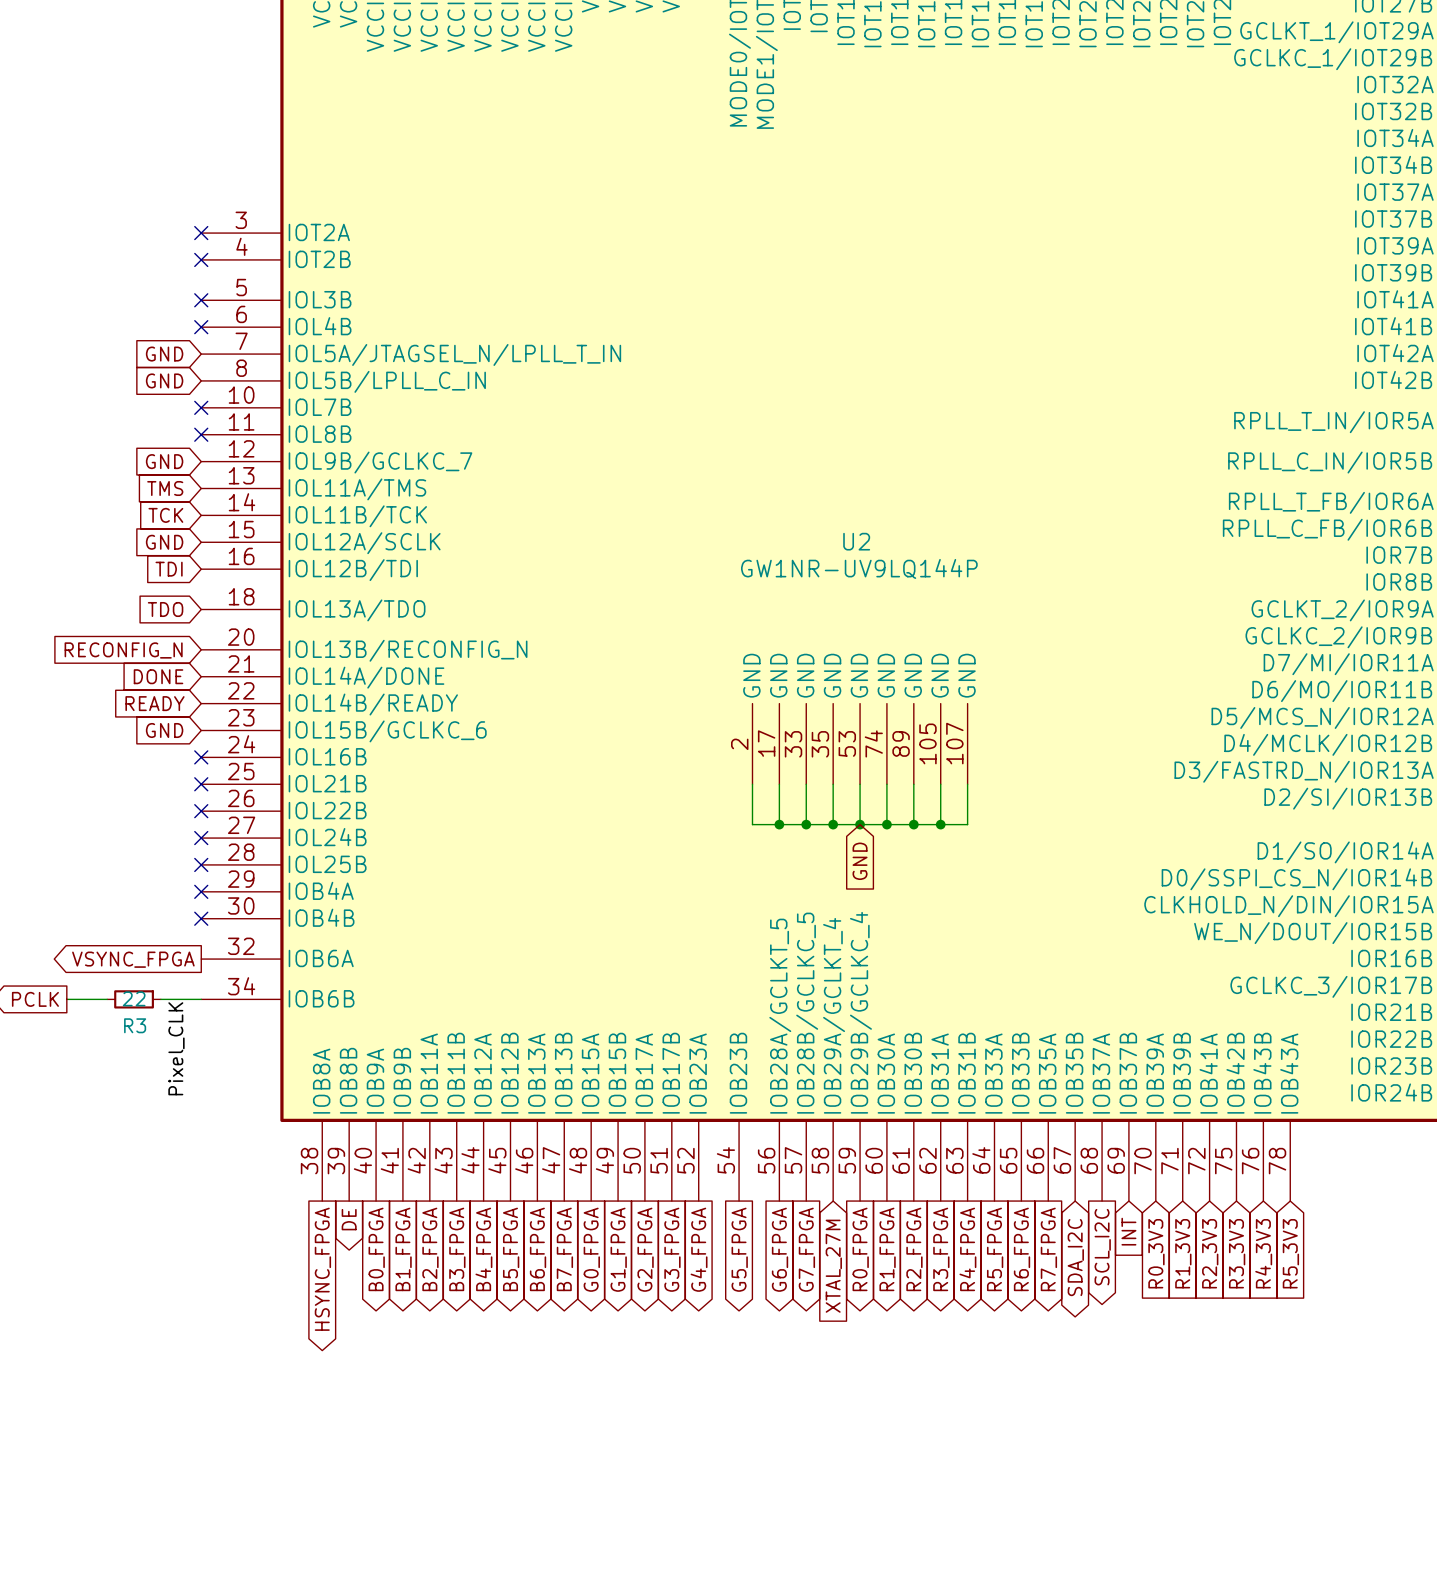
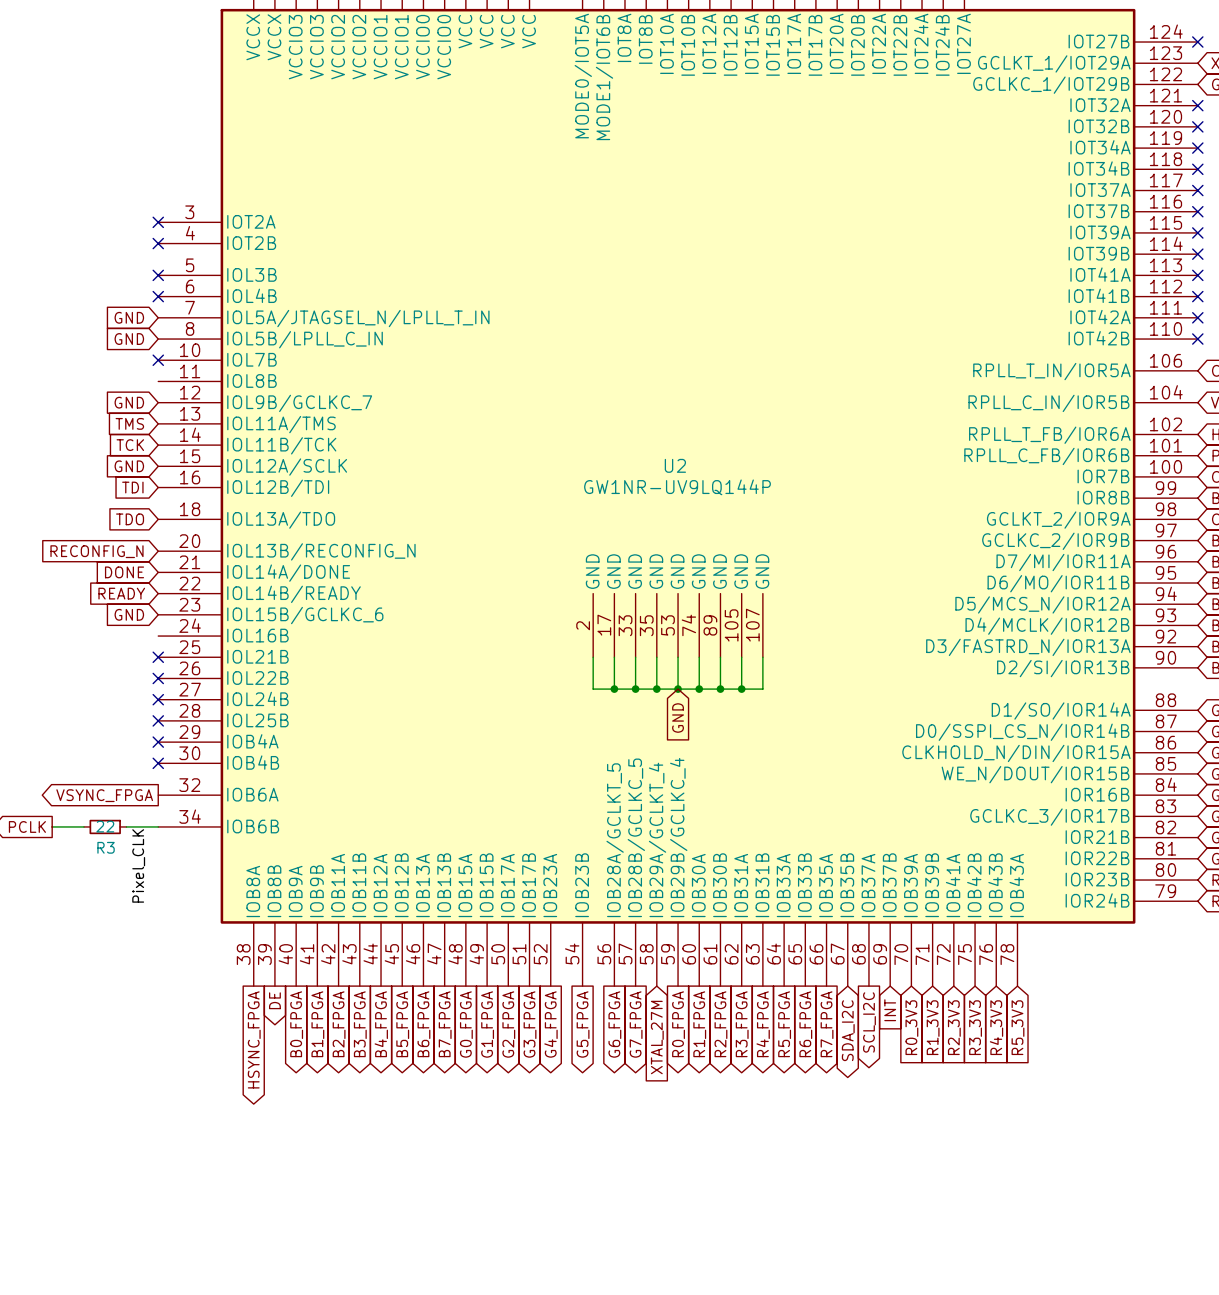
no-connect mark: (201, 434) -> none
no-connect mark: (201, 757) -> none

